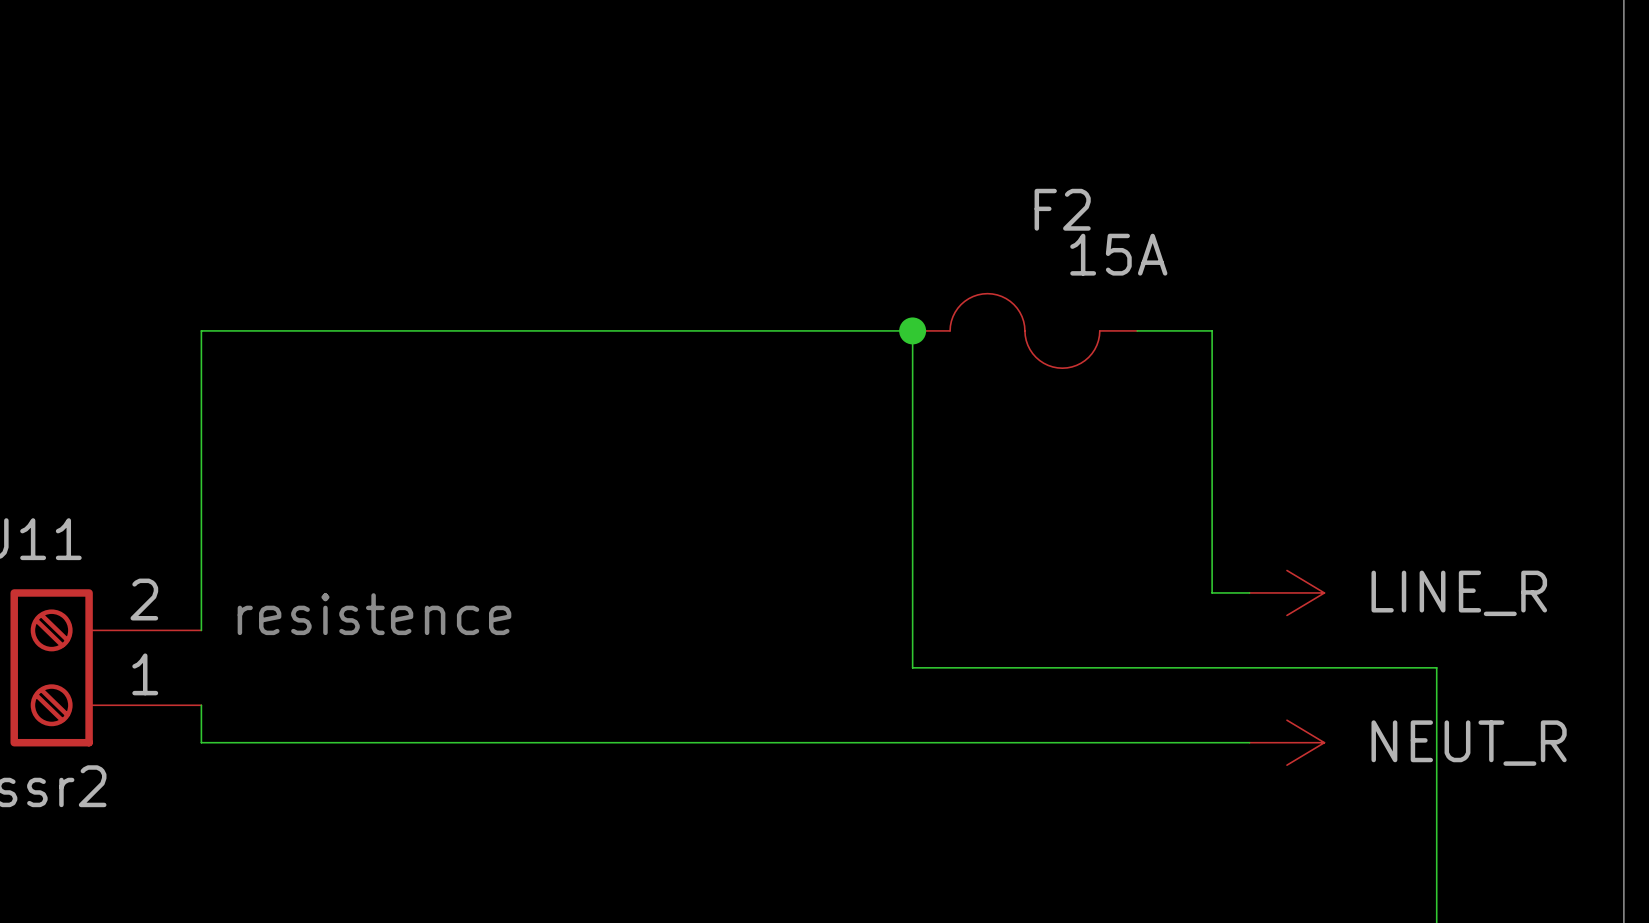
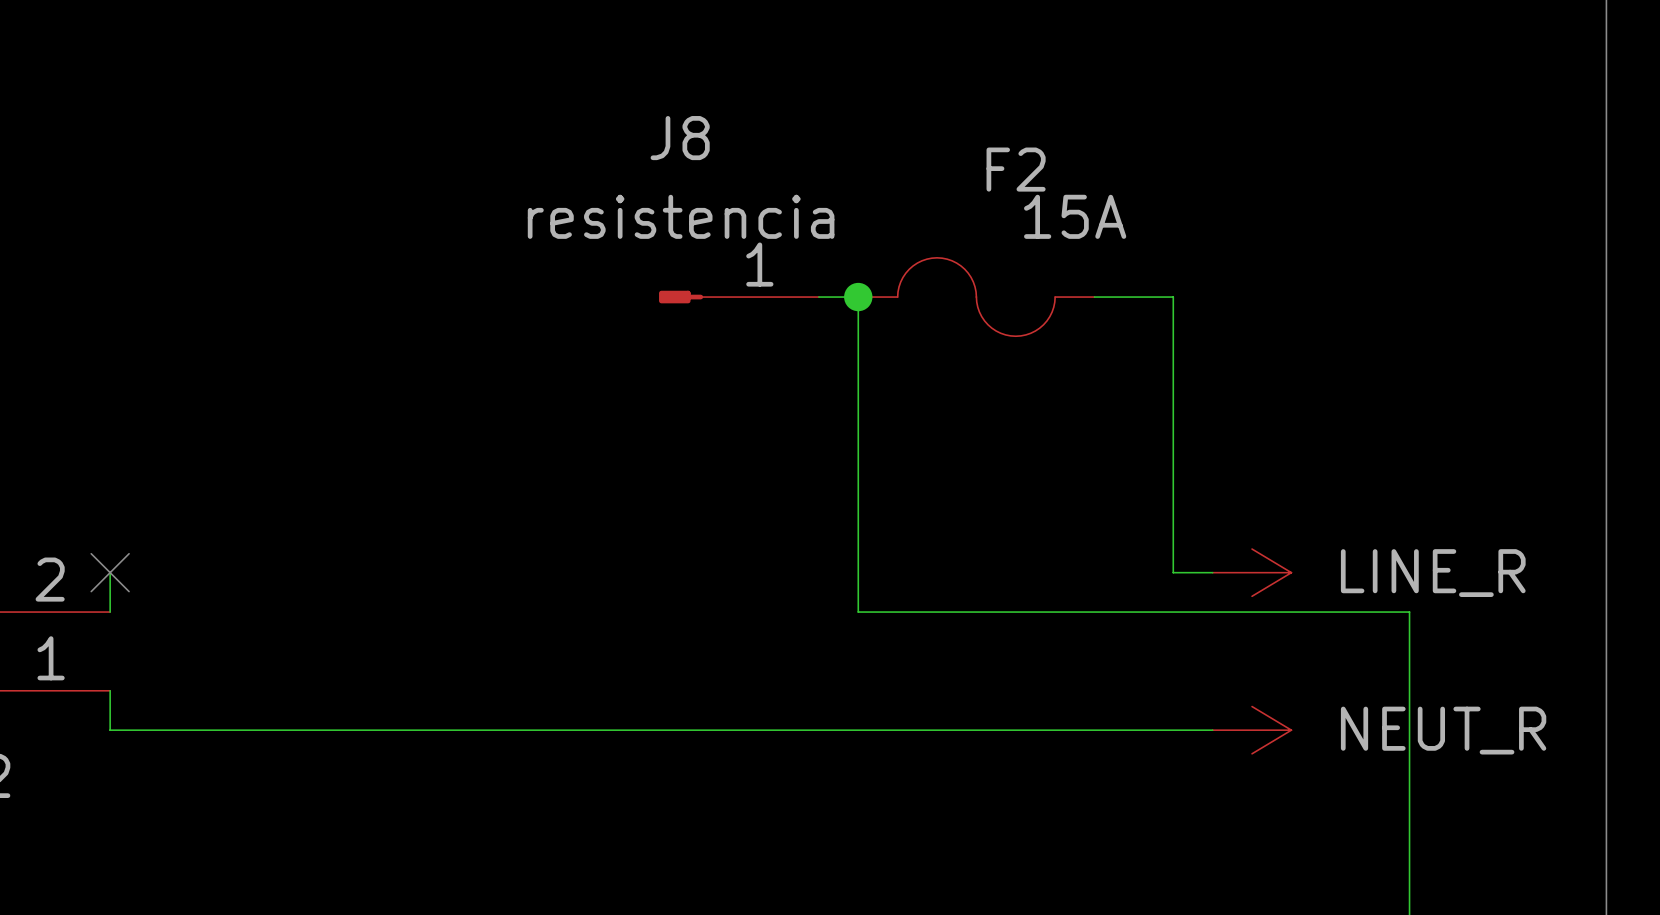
J8: none -> resistencia (738, 297)
wire: (875, 330) (201, 330) (201, 592) -> none
no-connect mark: none -> (110, 572)
text: resistence (374, 614) -> none
wire: (912, 630) (912, 667) (1436, 667) -> (858, 612) (1409, 612) (1409, 651)

